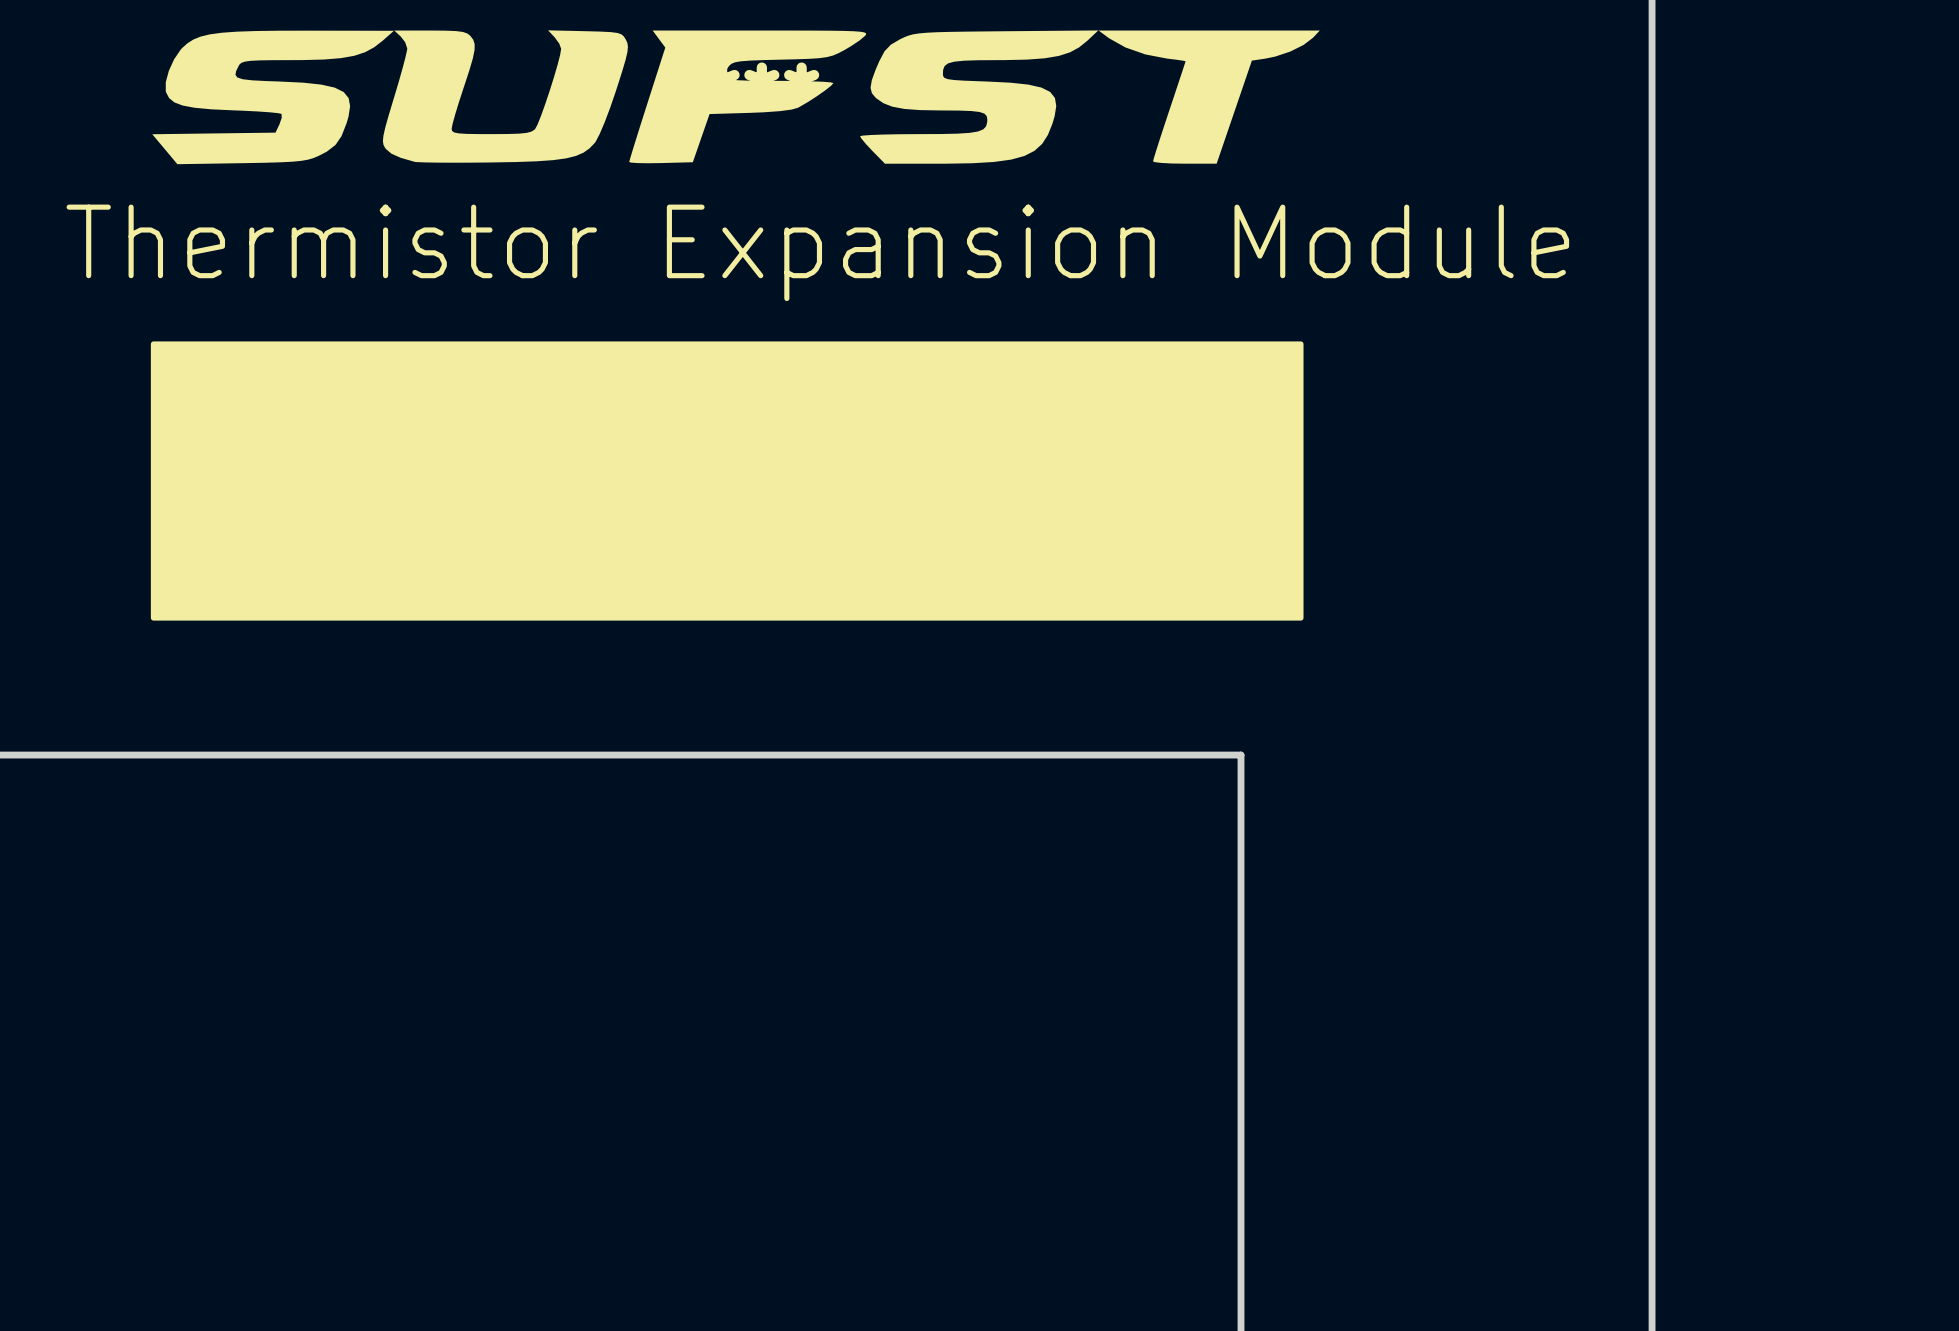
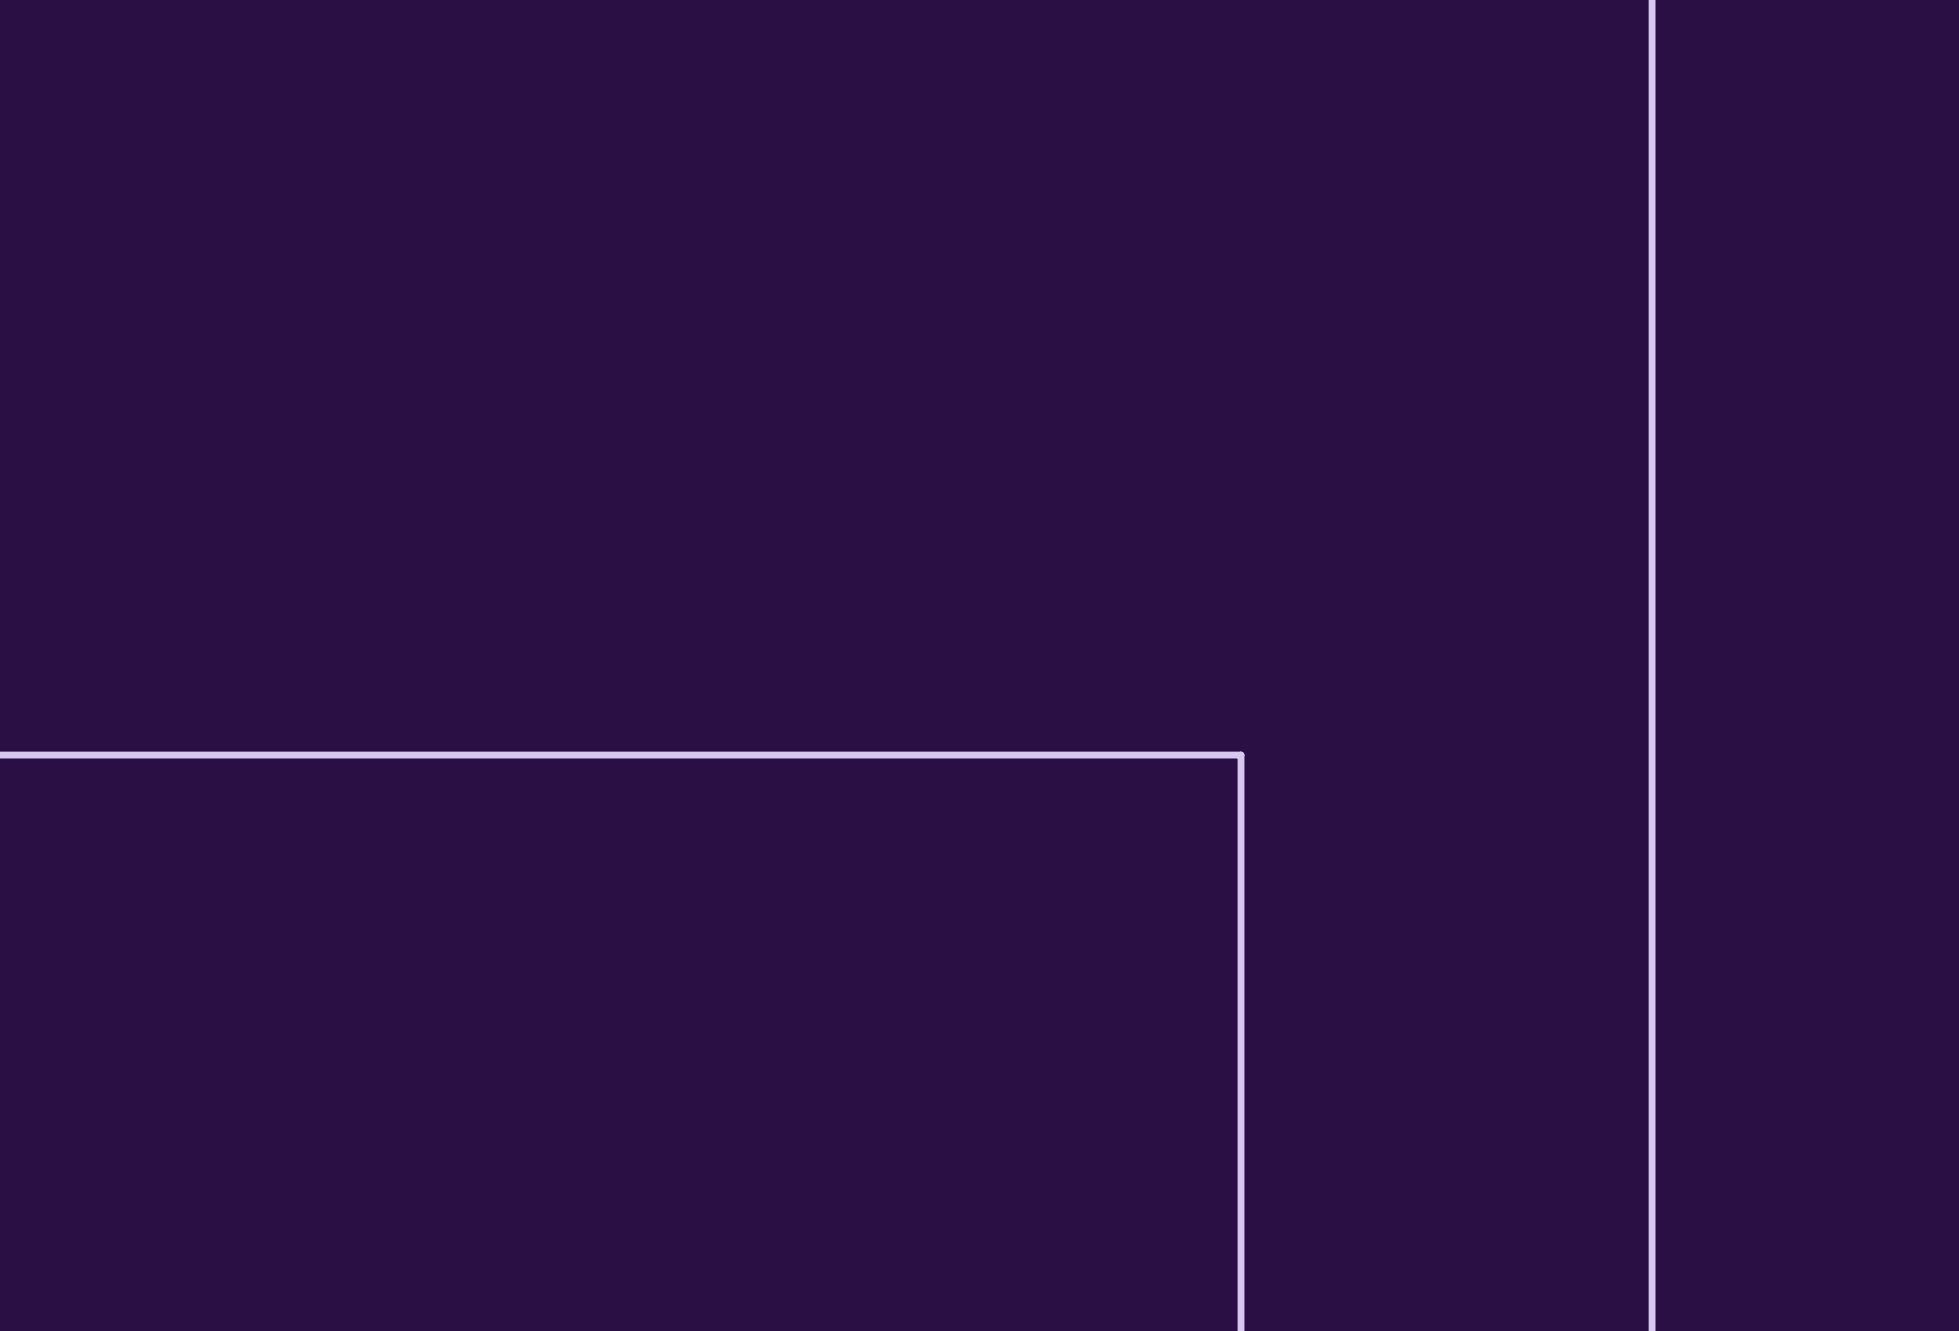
part: (736, 97) -> none
text: Thermistor Expansion Module (817, 252) -> none
drawing: [150, 341, 1304, 621] -> none

